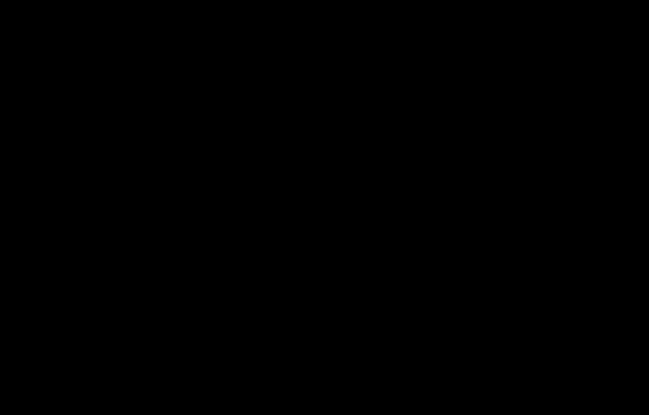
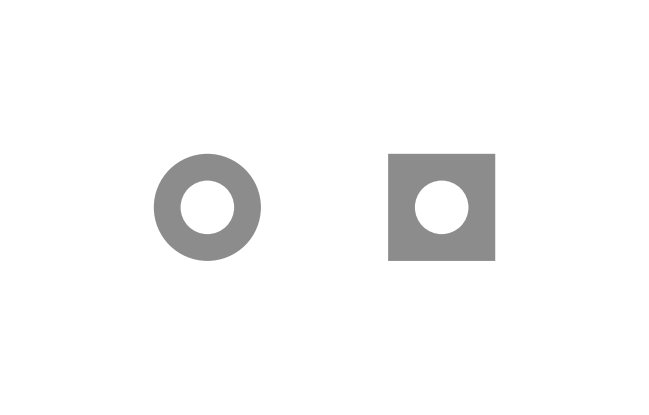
part: none -> (324, 207)

